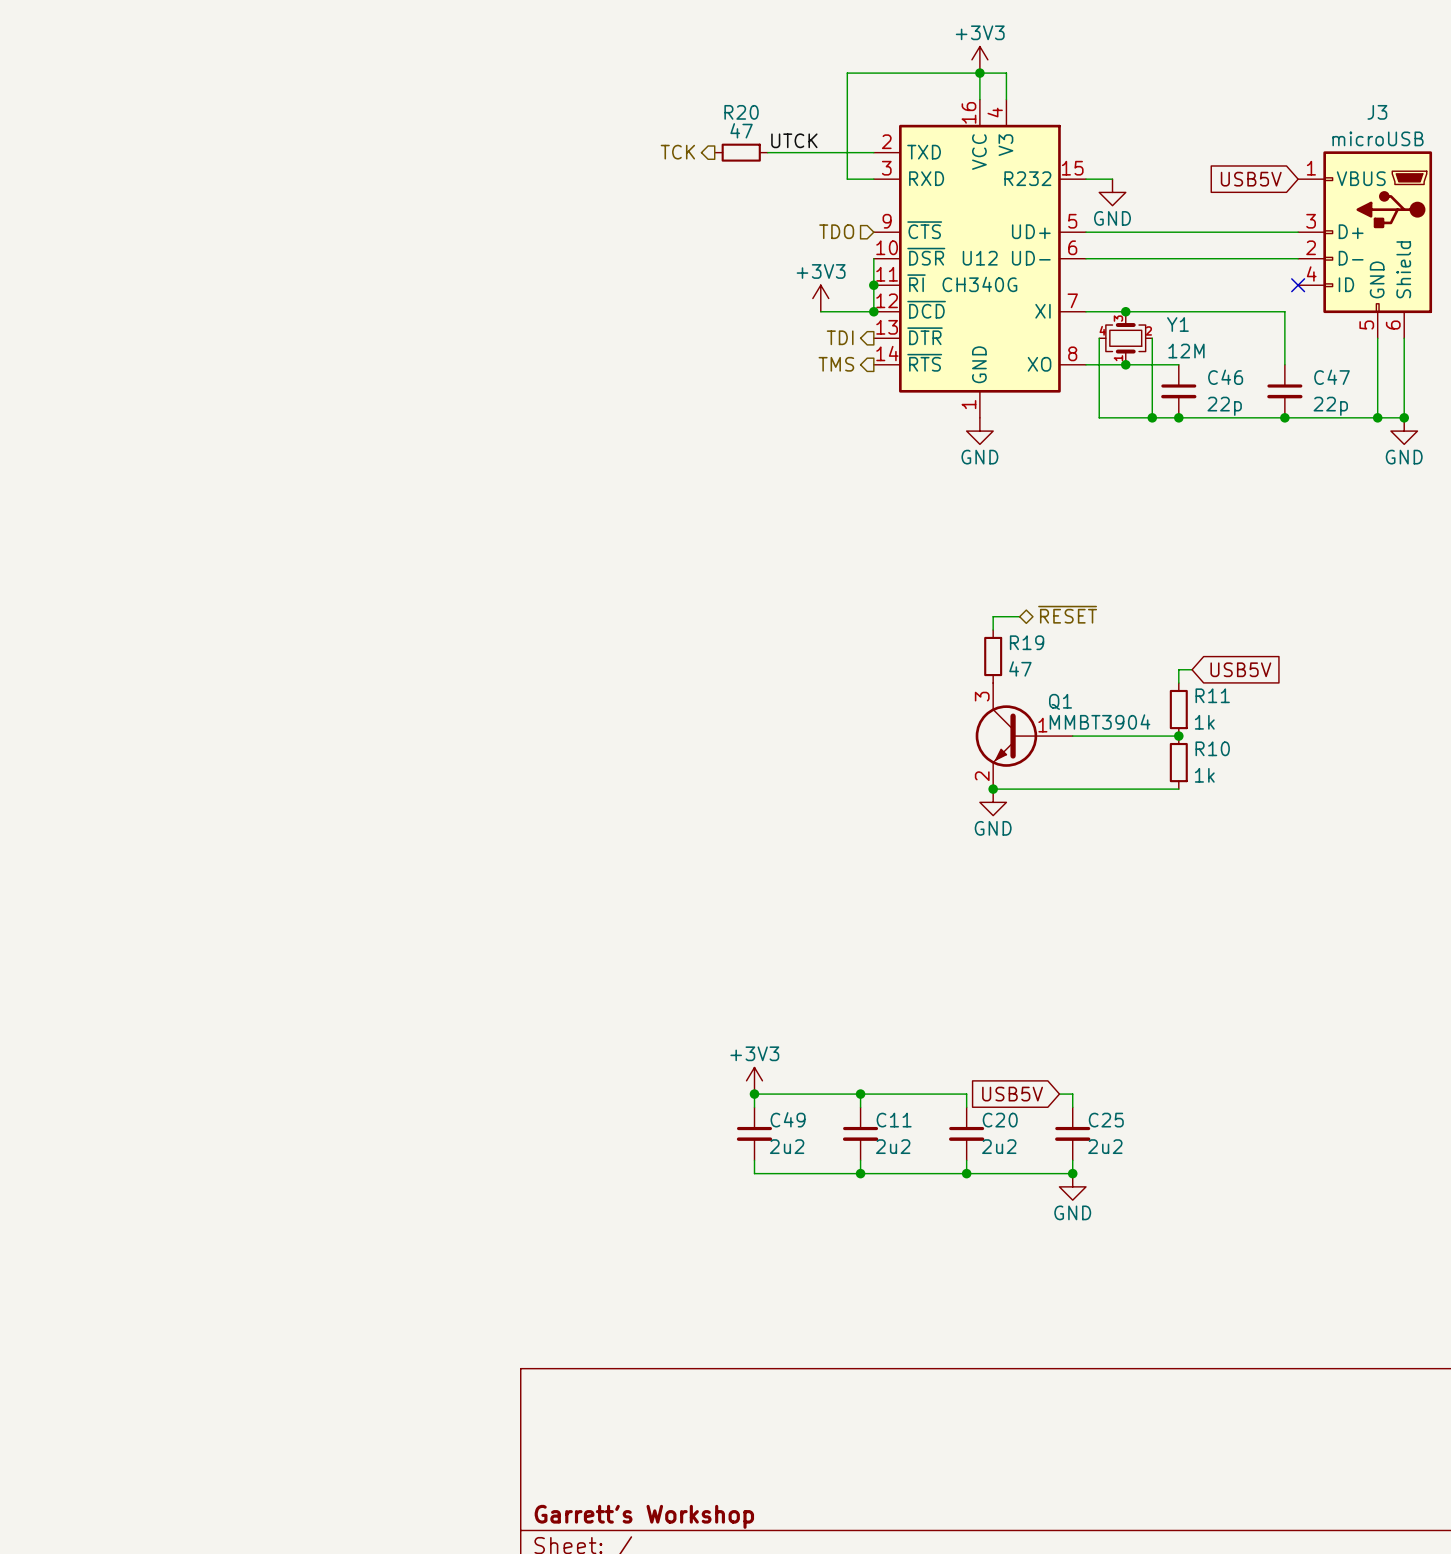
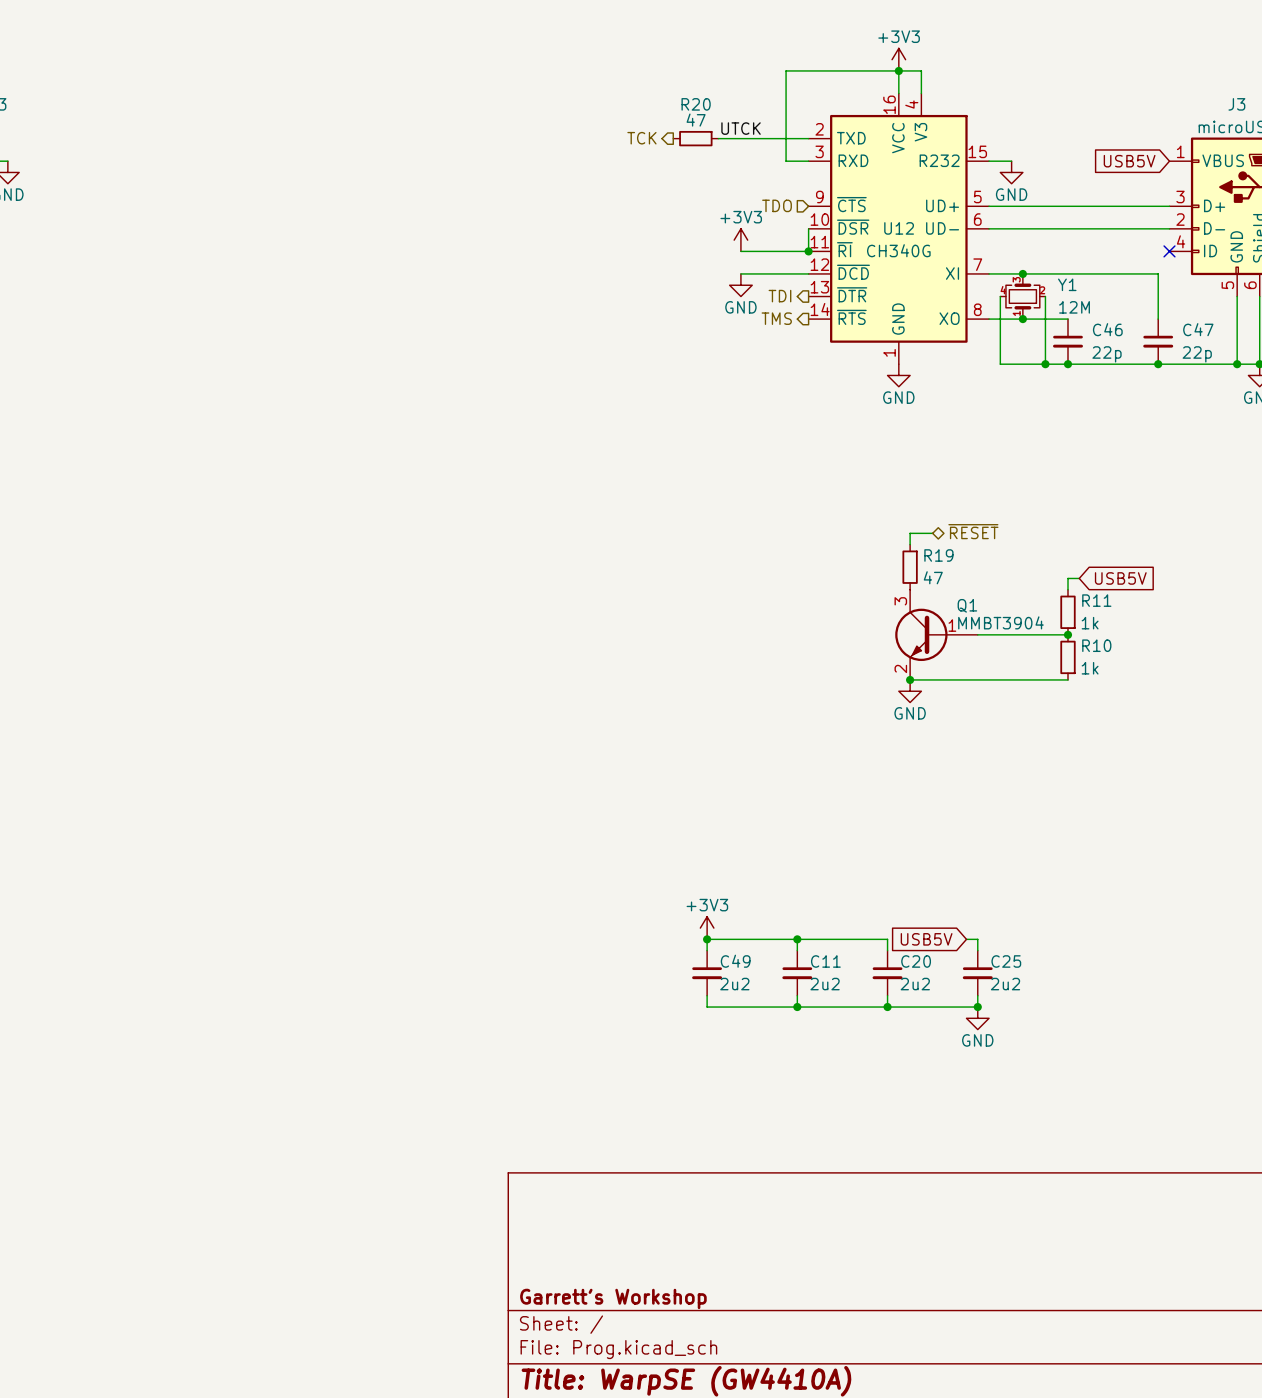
wire: (873, 285) (873, 311) -> (808, 251) (740, 251)
power symbol position: +3V3 (820, 298) -> +3V3 (740, 240)
wire: none -> (740, 273) (763, 273)
junction: (873, 311) -> none
power symbol: none -> GND (740, 285)

